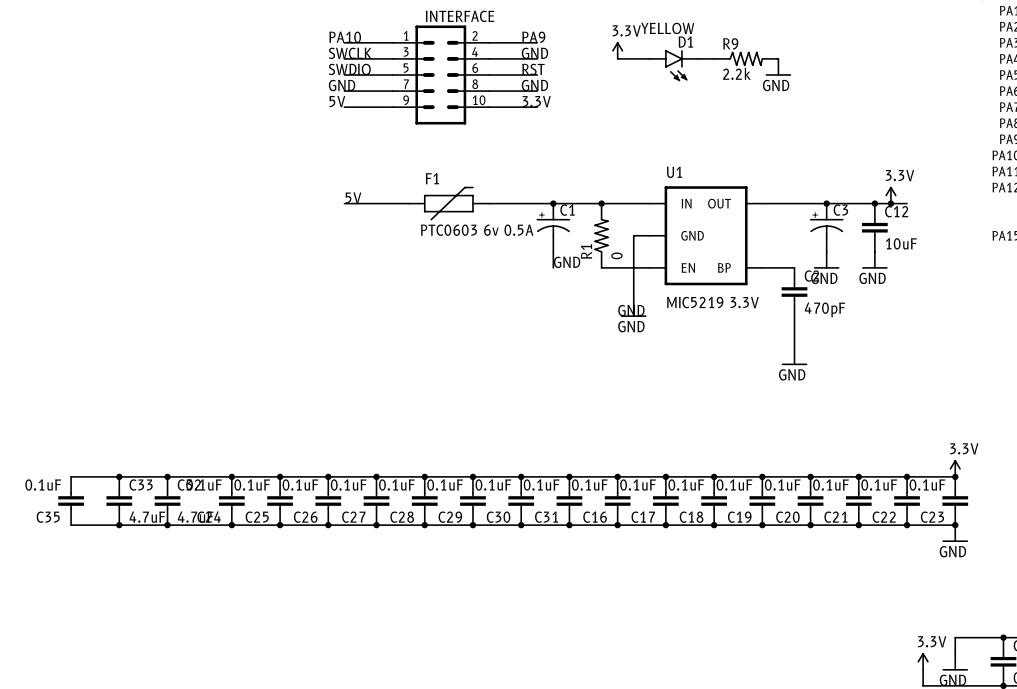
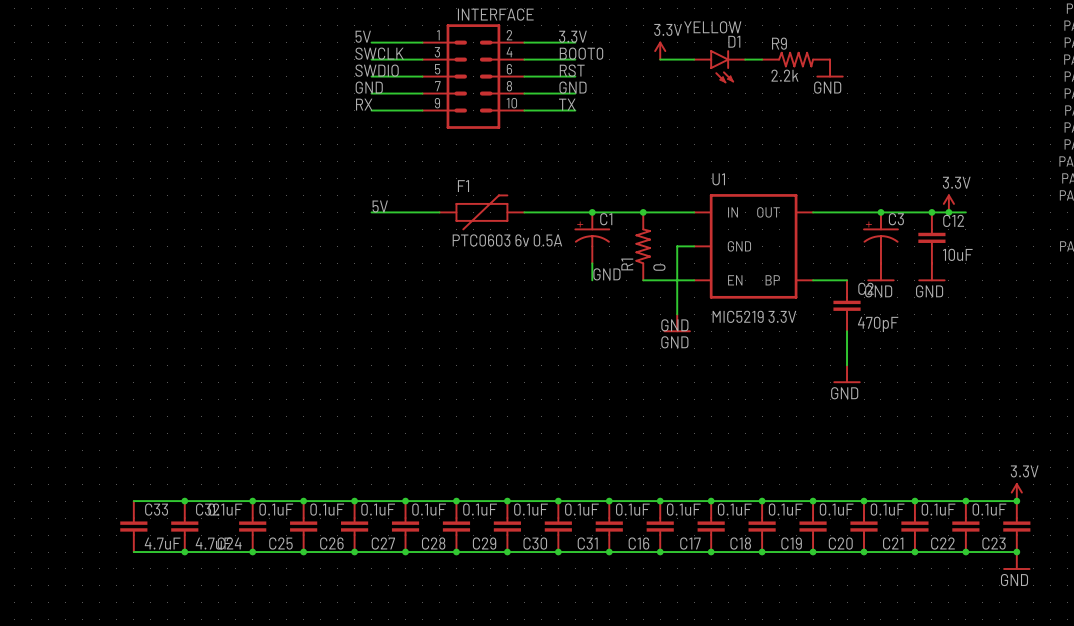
label: PA10 (345, 37) -> 5V (363, 36)
label: PA9 (533, 37) -> 3.3V (572, 36)
label: GND (534, 53) -> BOOT0 (581, 53)
label: 5V (337, 101) -> RX (364, 104)
label: 3.3V (536, 101) -> TX (567, 104)
wire: (71, 476) (119, 476) -> none
junction: (119, 476) -> none
C35: 0.1uF (71, 501) -> none
wire: (71, 525) (119, 525) -> none
junction: (119, 525) -> none

